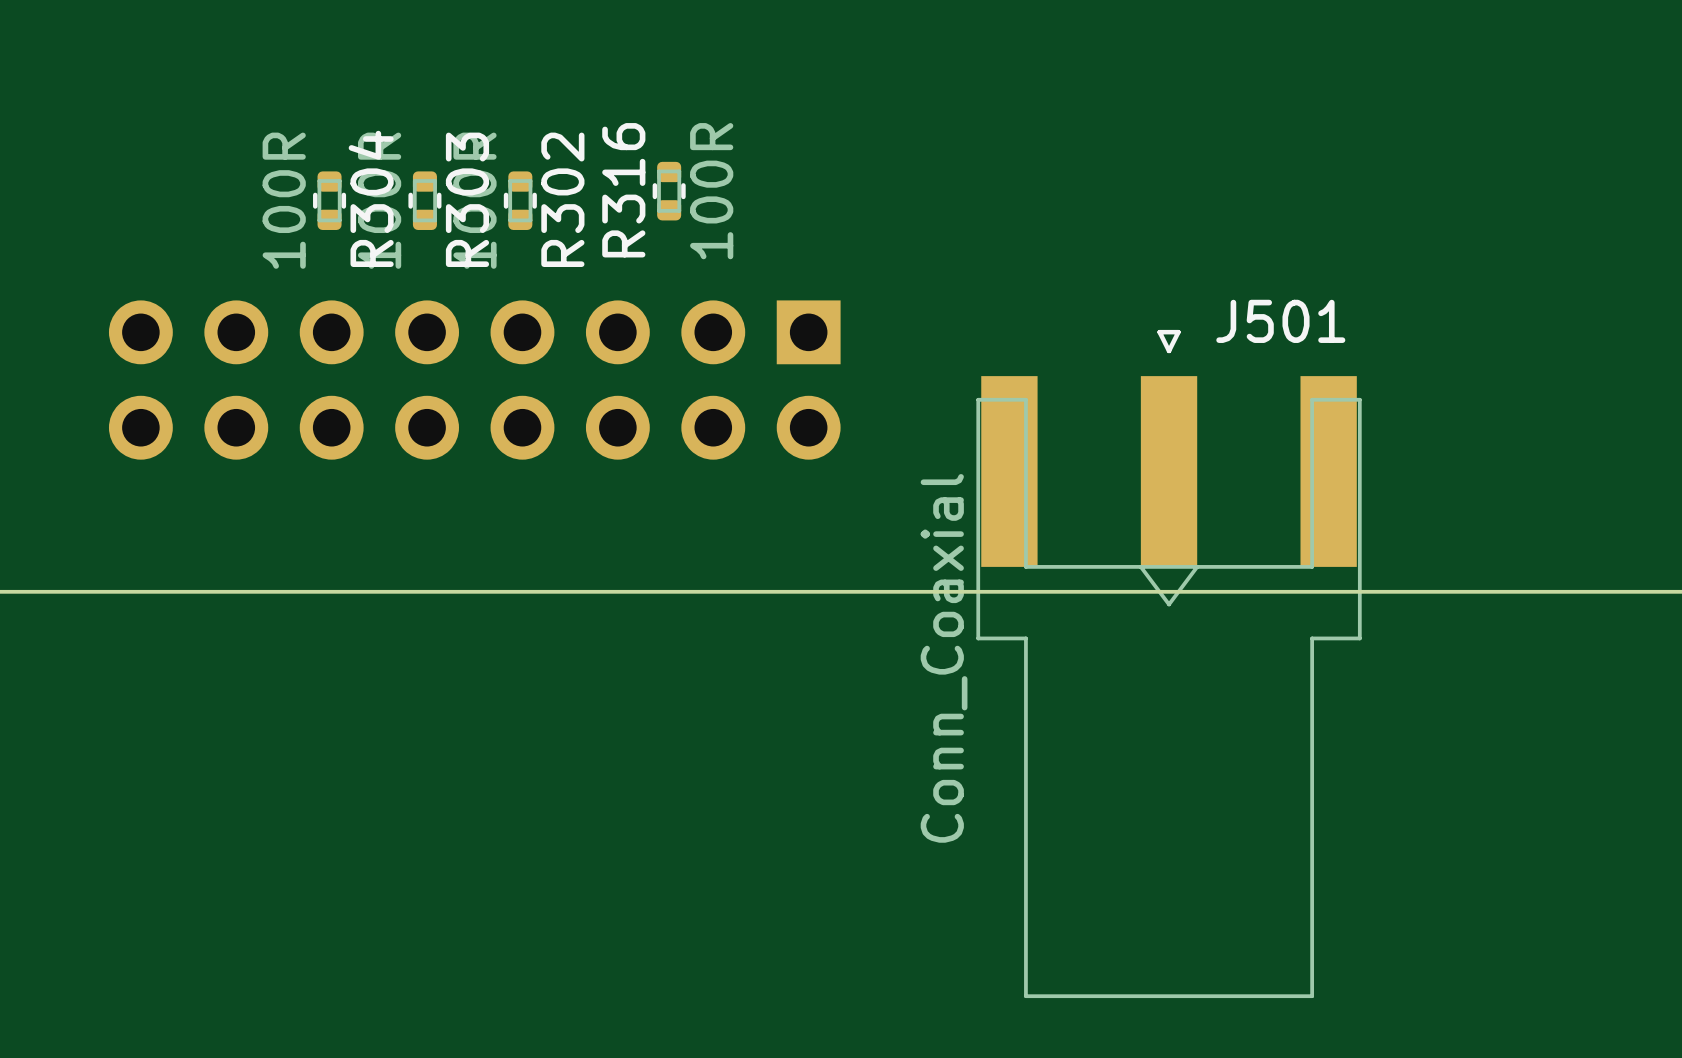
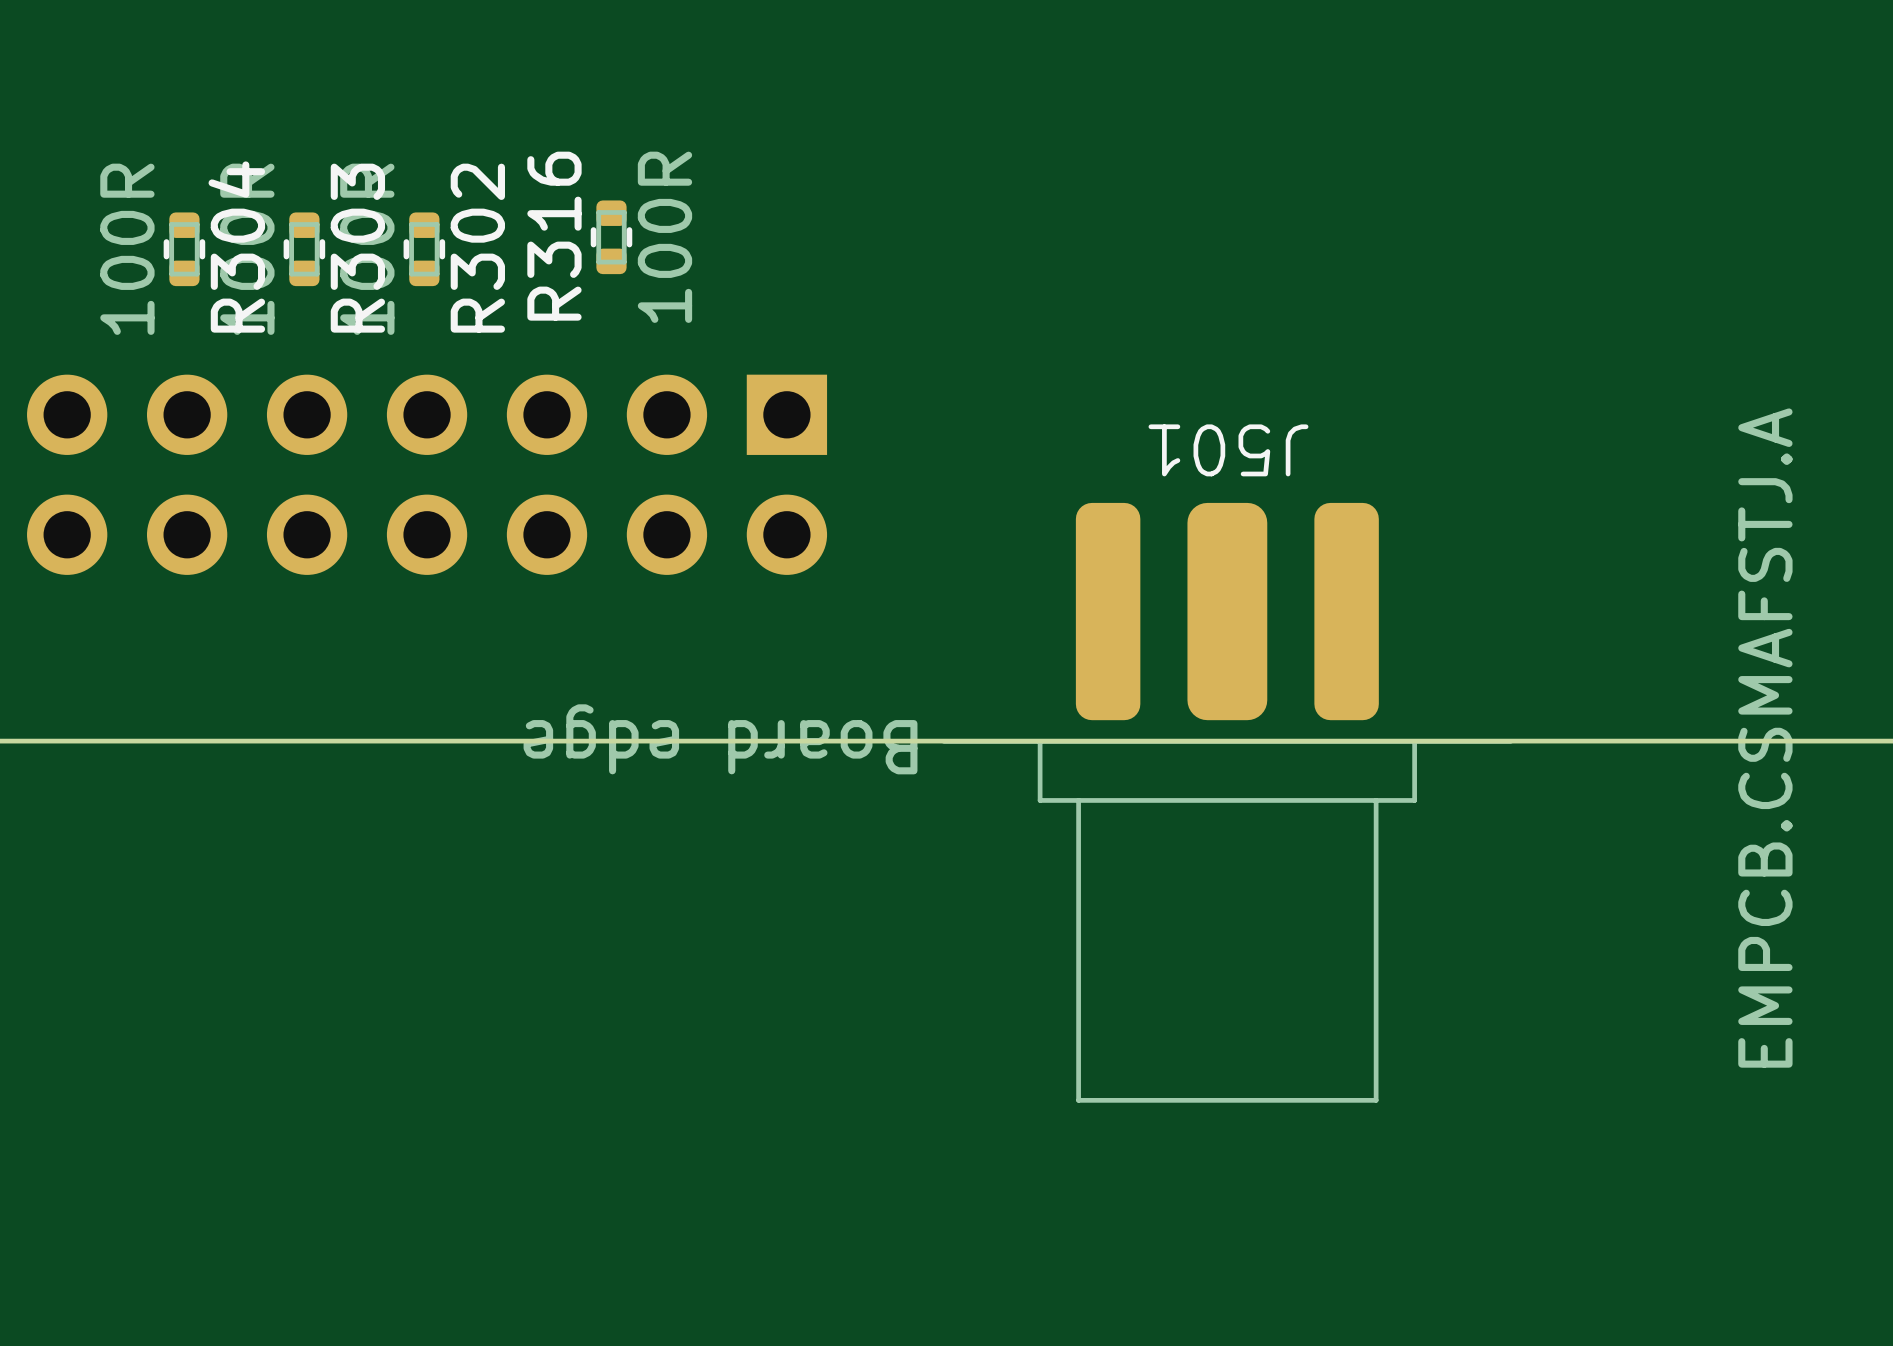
J501 name position: J501 (1280, 321) -> J501 (1228, 450)
J501 footprint: [976, 329, 1362, 999] -> [941, 502, 1514, 1103]
J501 value: Conn_Coaxial (944, 658) -> EMPCB.CSMAFSTJ.A (1765, 738)

